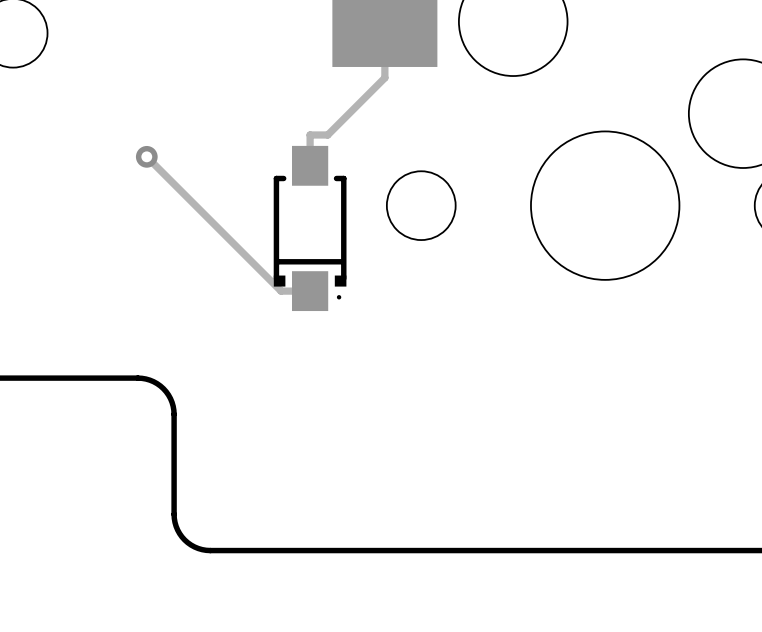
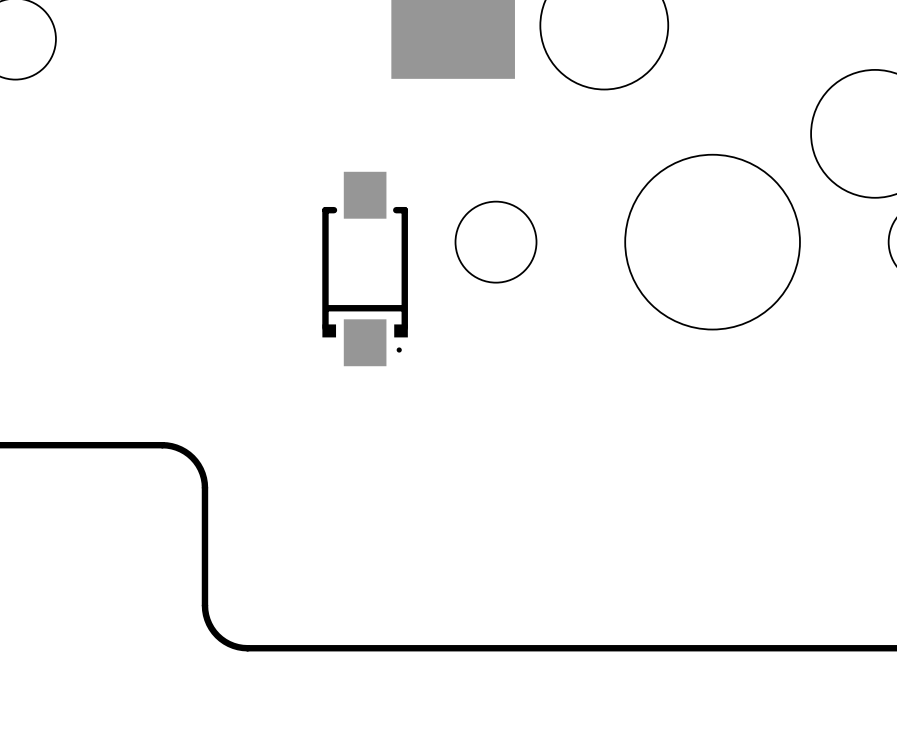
track: (384, 21) (384, 77) (327, 134) (310, 134) (310, 165) -> none
track: (146, 156) (281, 291) (310, 291) -> none
via: (146, 156) -> none

